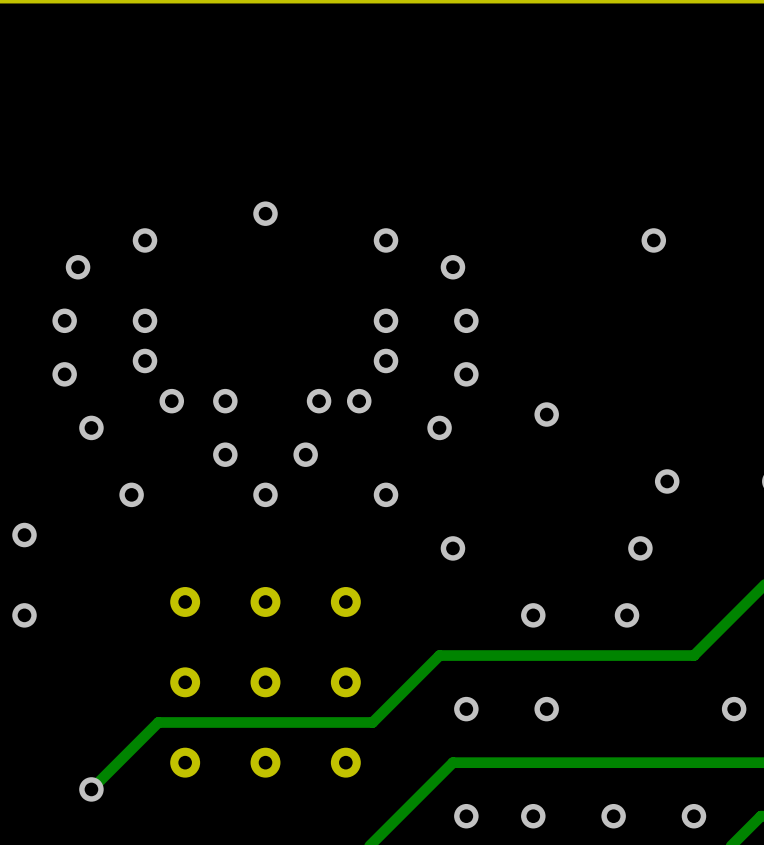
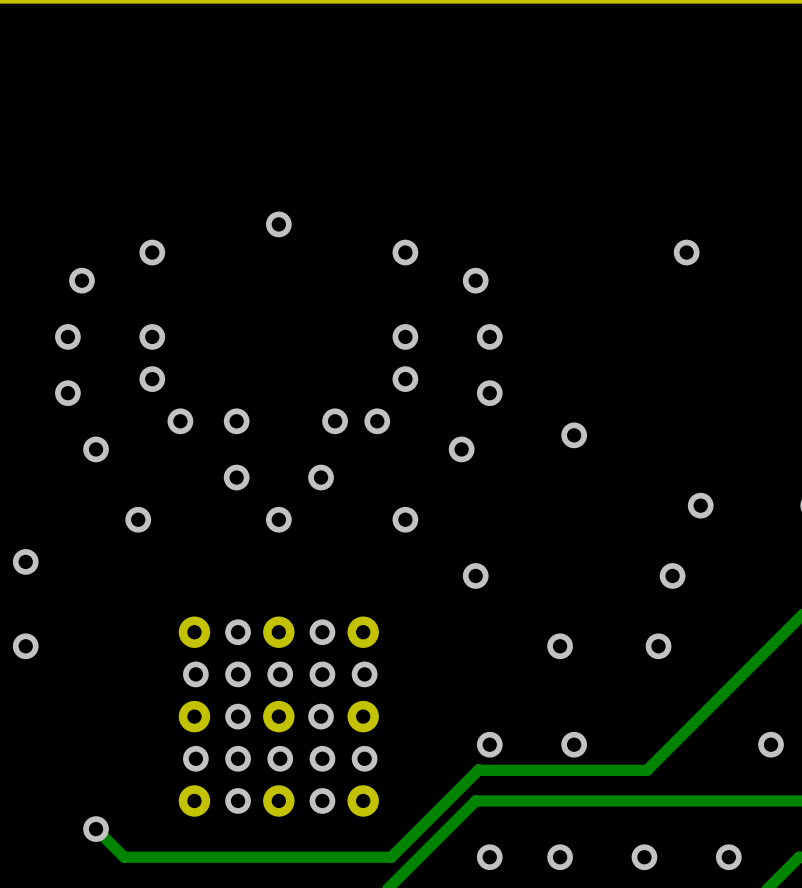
via: none -> (238, 632)
via: none -> (322, 632)
via: none -> (195, 674)
via: none -> (238, 674)
via: none -> (280, 674)
via: none -> (322, 674)
via: none -> (364, 674)
track: (693, 655) (439, 655) (372, 722) (158, 722) (91, 789) -> (478, 769) (391, 857) (124, 857) (96, 829)
track: none -> (728, 688) (646, 770) (479, 770)
via: none -> (238, 716)
via: none -> (321, 716)
via: none -> (195, 758)
via: none -> (238, 758)
via: none -> (280, 758)
via: none -> (322, 758)
via: none -> (364, 758)
via: none -> (238, 800)
via: none -> (322, 800)

